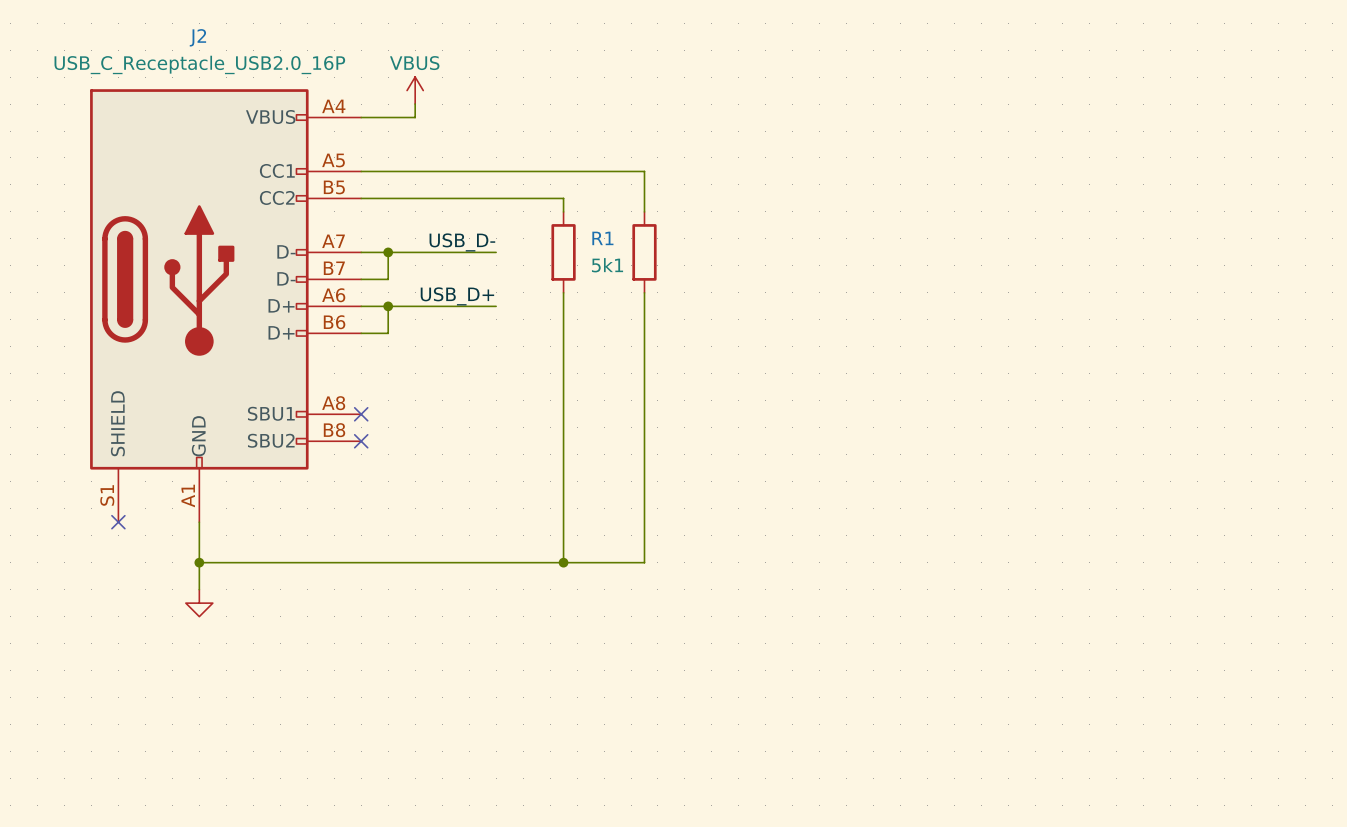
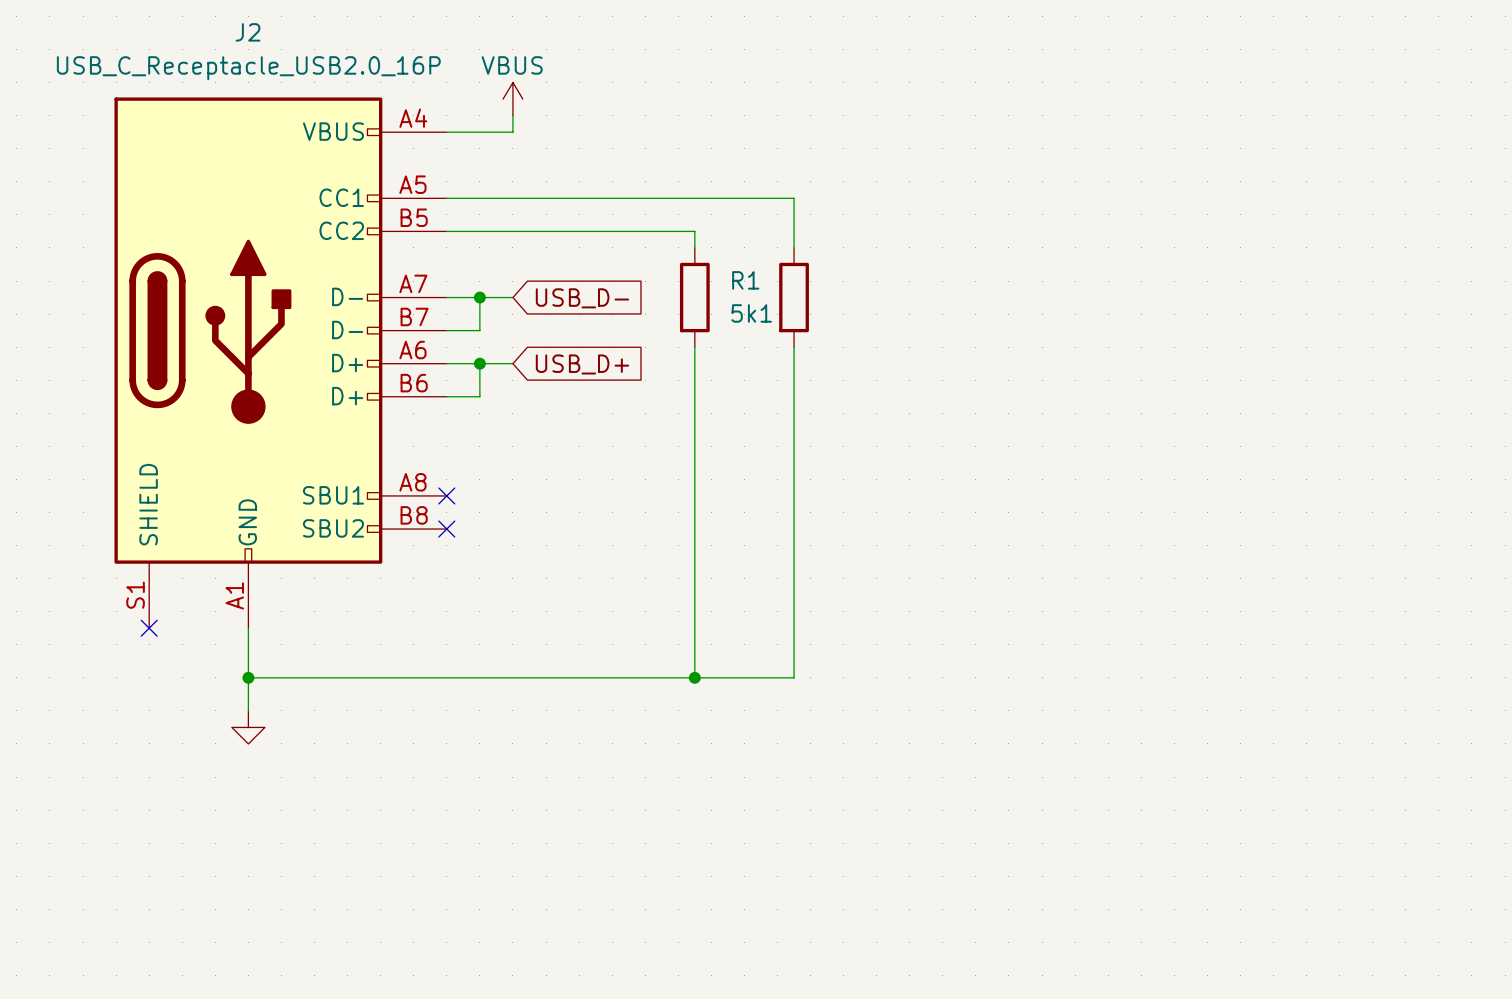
label: USB_D- (462, 242) -> none
wire: (415, 252) (496, 252) -> none
global label: none -> USB_D- (582, 298)
label: USB_D+ (457, 296) -> none
wire: (415, 306) (496, 306) -> none
global label: none -> USB_D+ (582, 364)

